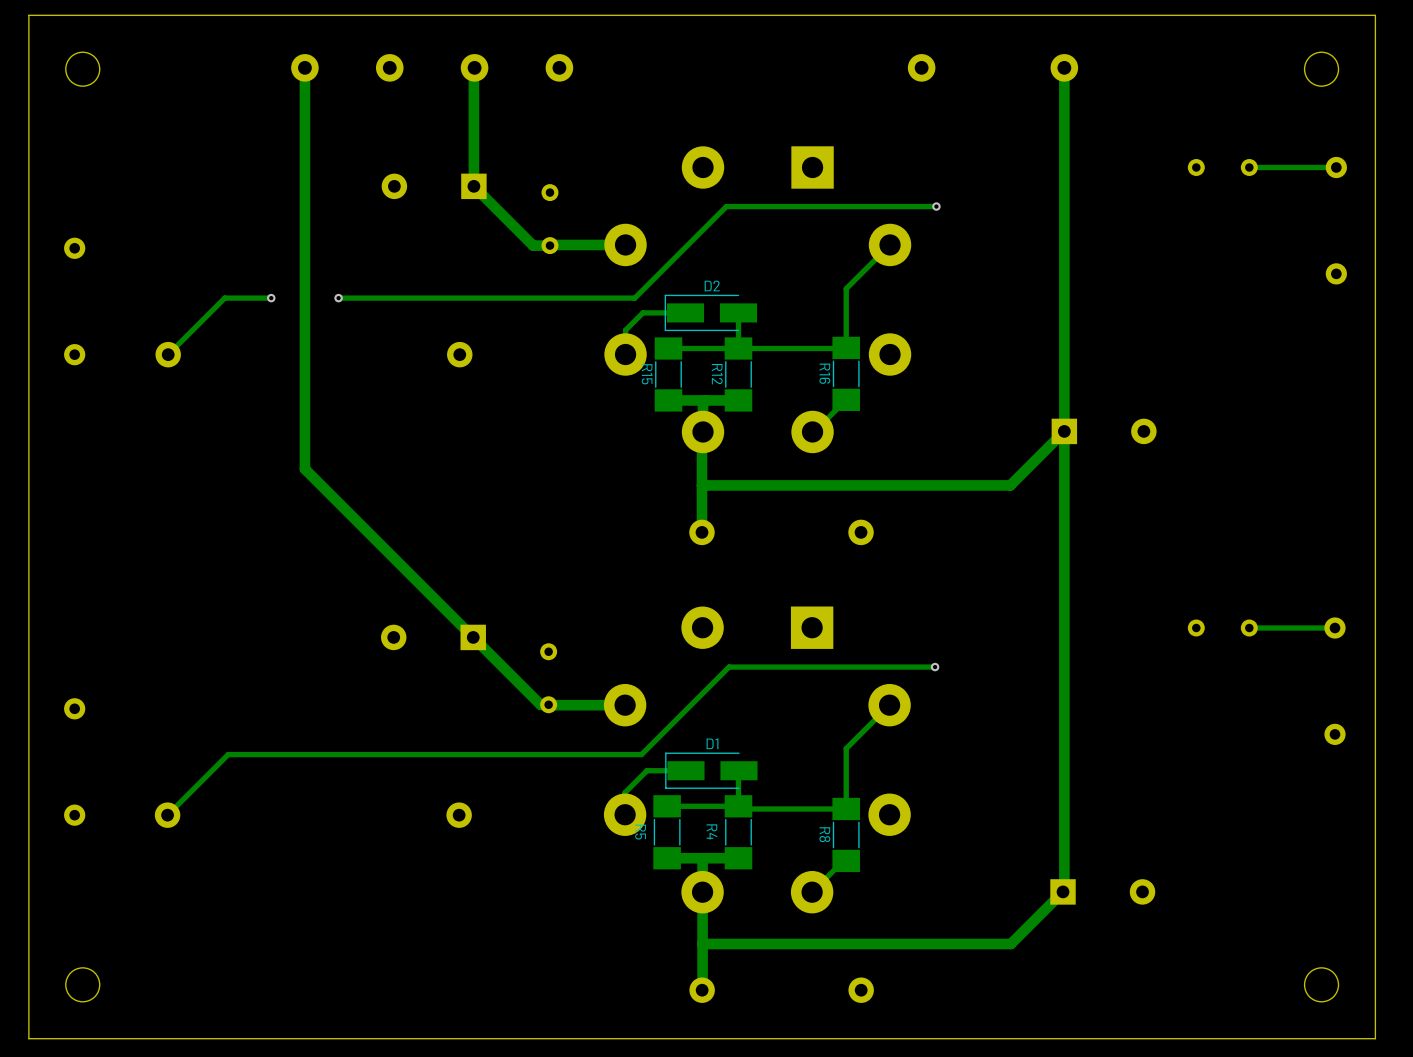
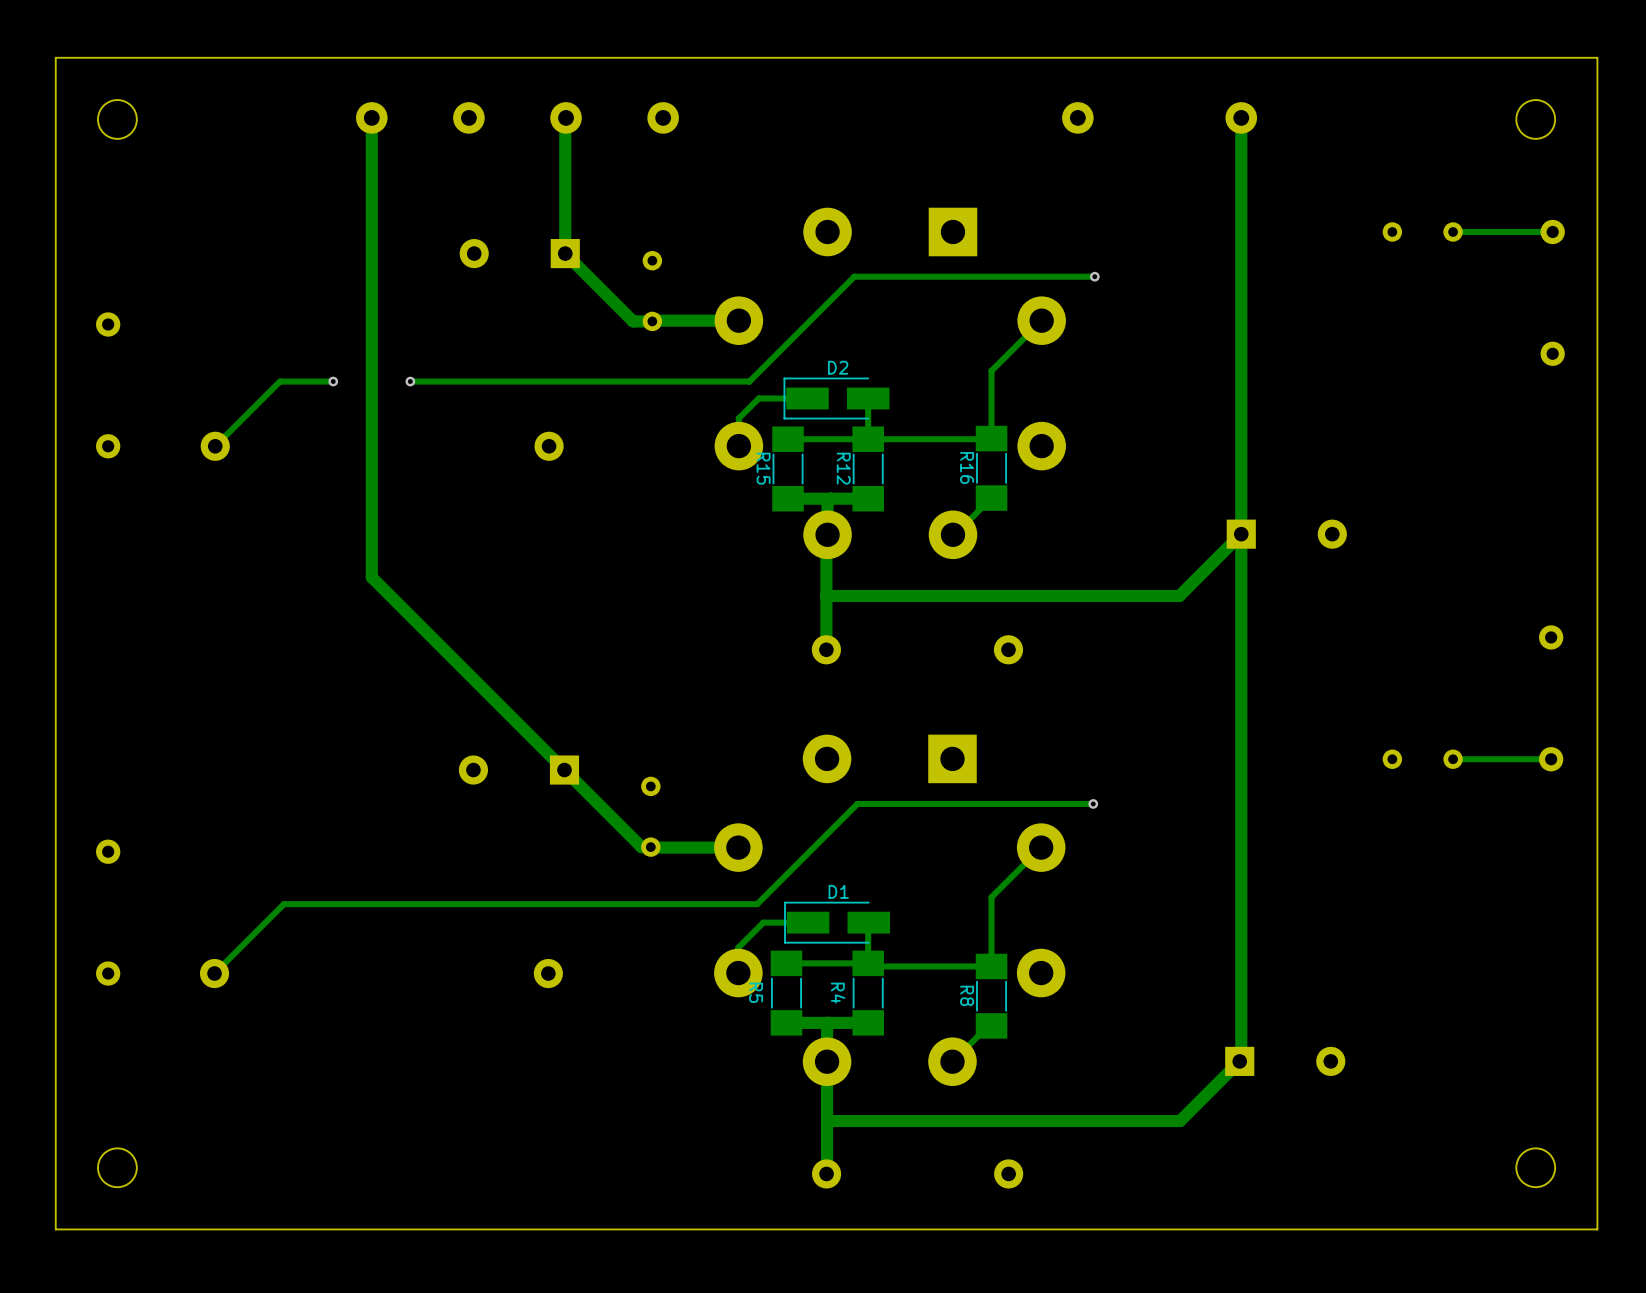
part position: (1335, 734) -> (1551, 637)

